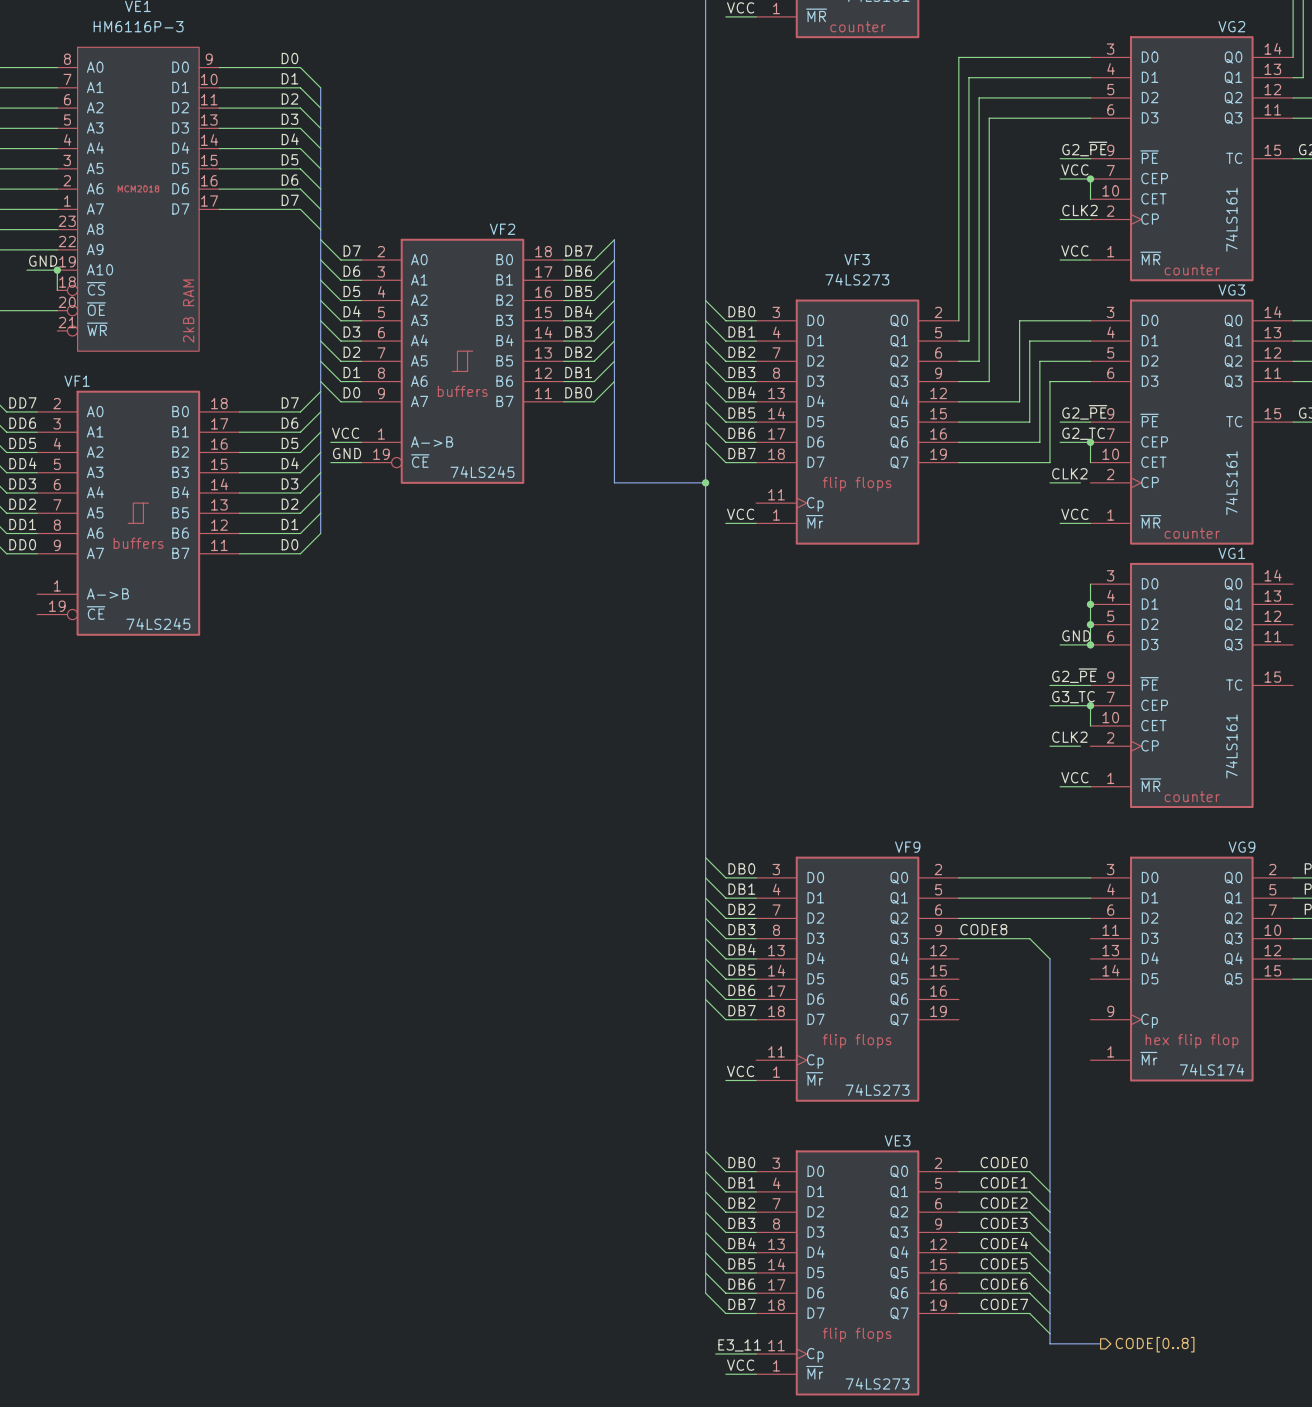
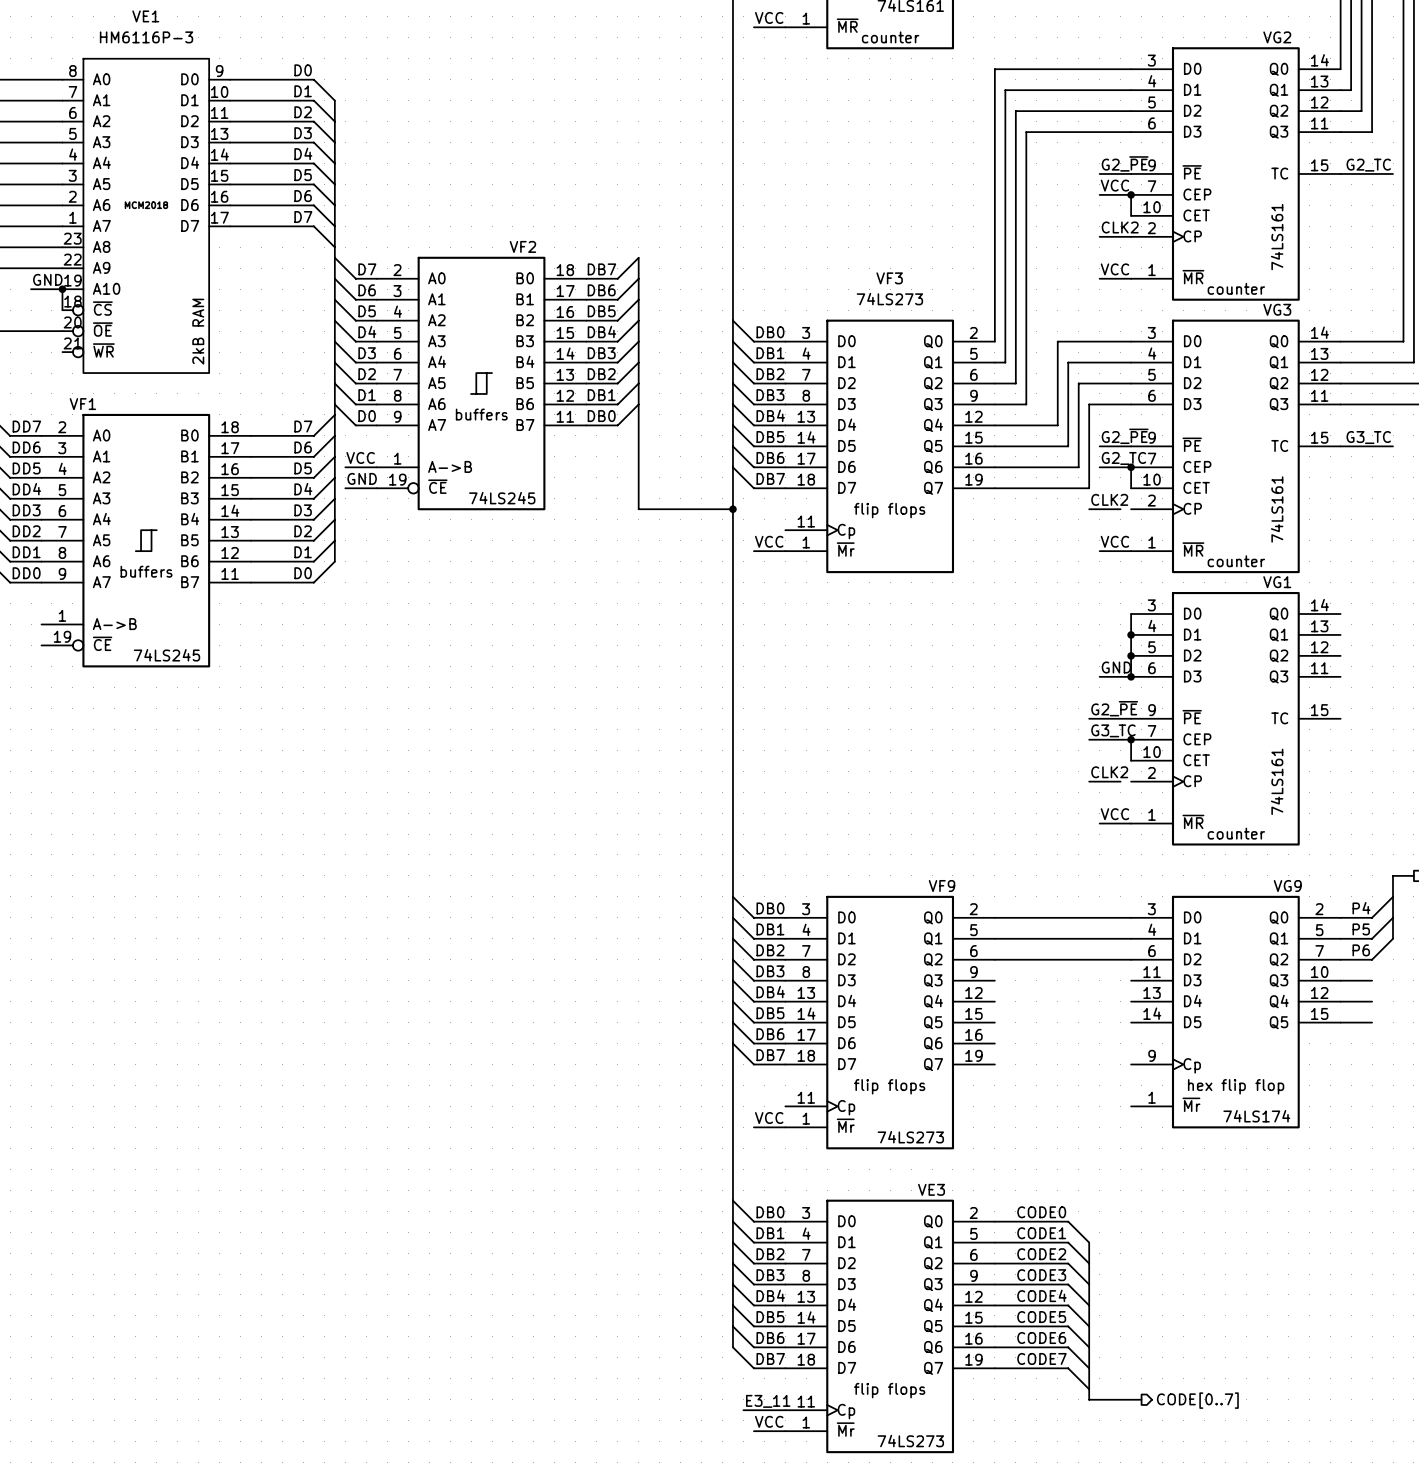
label: CODE8 (983, 929) -> none
wire: (958, 938) (1029, 938) (1049, 958) -> none
bus: (1049, 958) (1049, 1191) -> none
hierarchical label: CODE[0..8] (1155, 1344) -> CODE[0..7] (1197, 1400)

